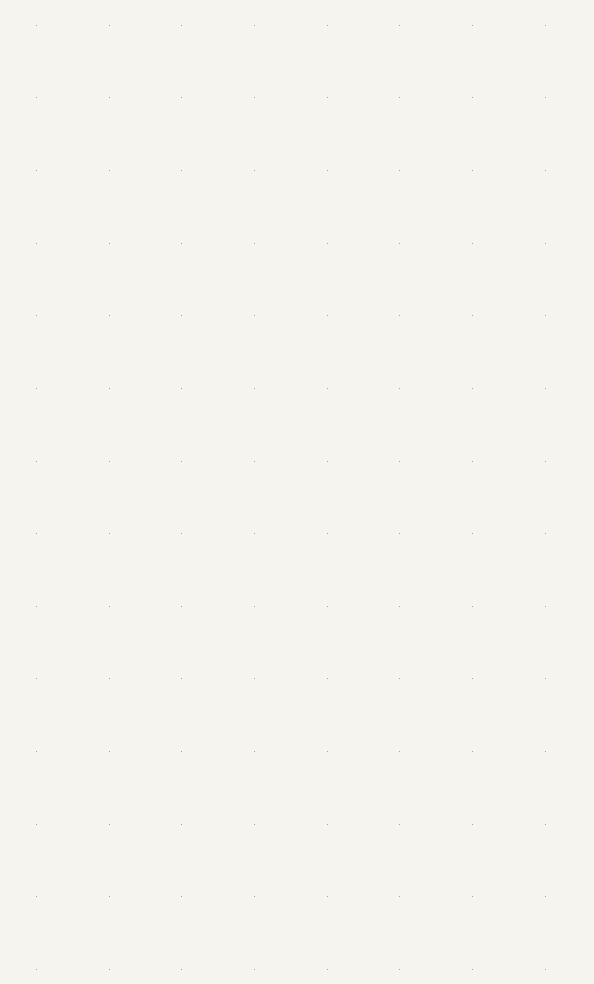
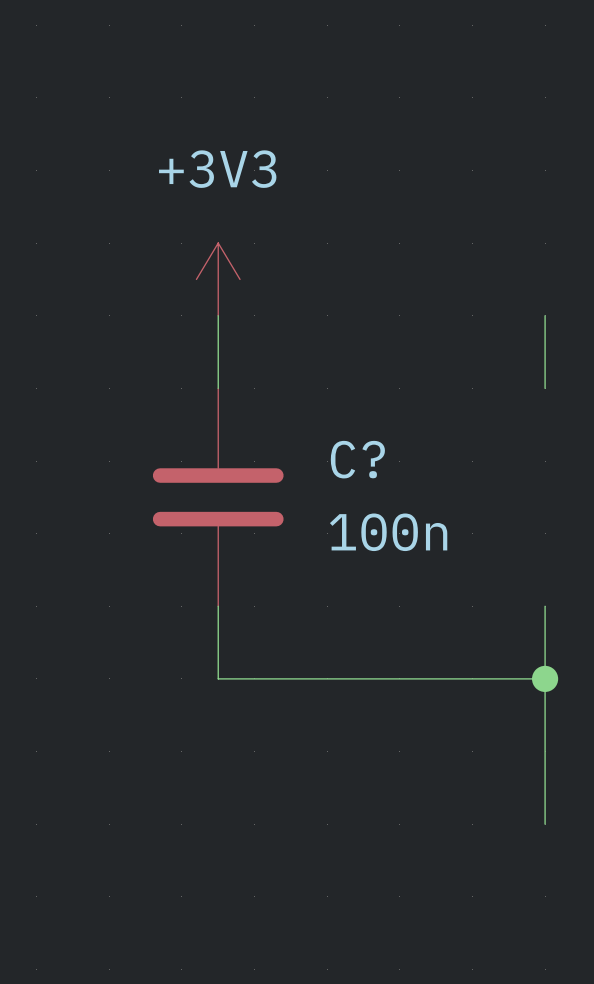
power symbol: none -> +3V3 (218, 279)
wire: none -> (218, 315) (218, 388)
wire: none -> (545, 315) (545, 388)
C?: none -> 100n (218, 497)
wire: none -> (218, 606) (218, 678) (545, 678)
wire: none -> (545, 606) (545, 824)
junction: none -> (545, 678)

